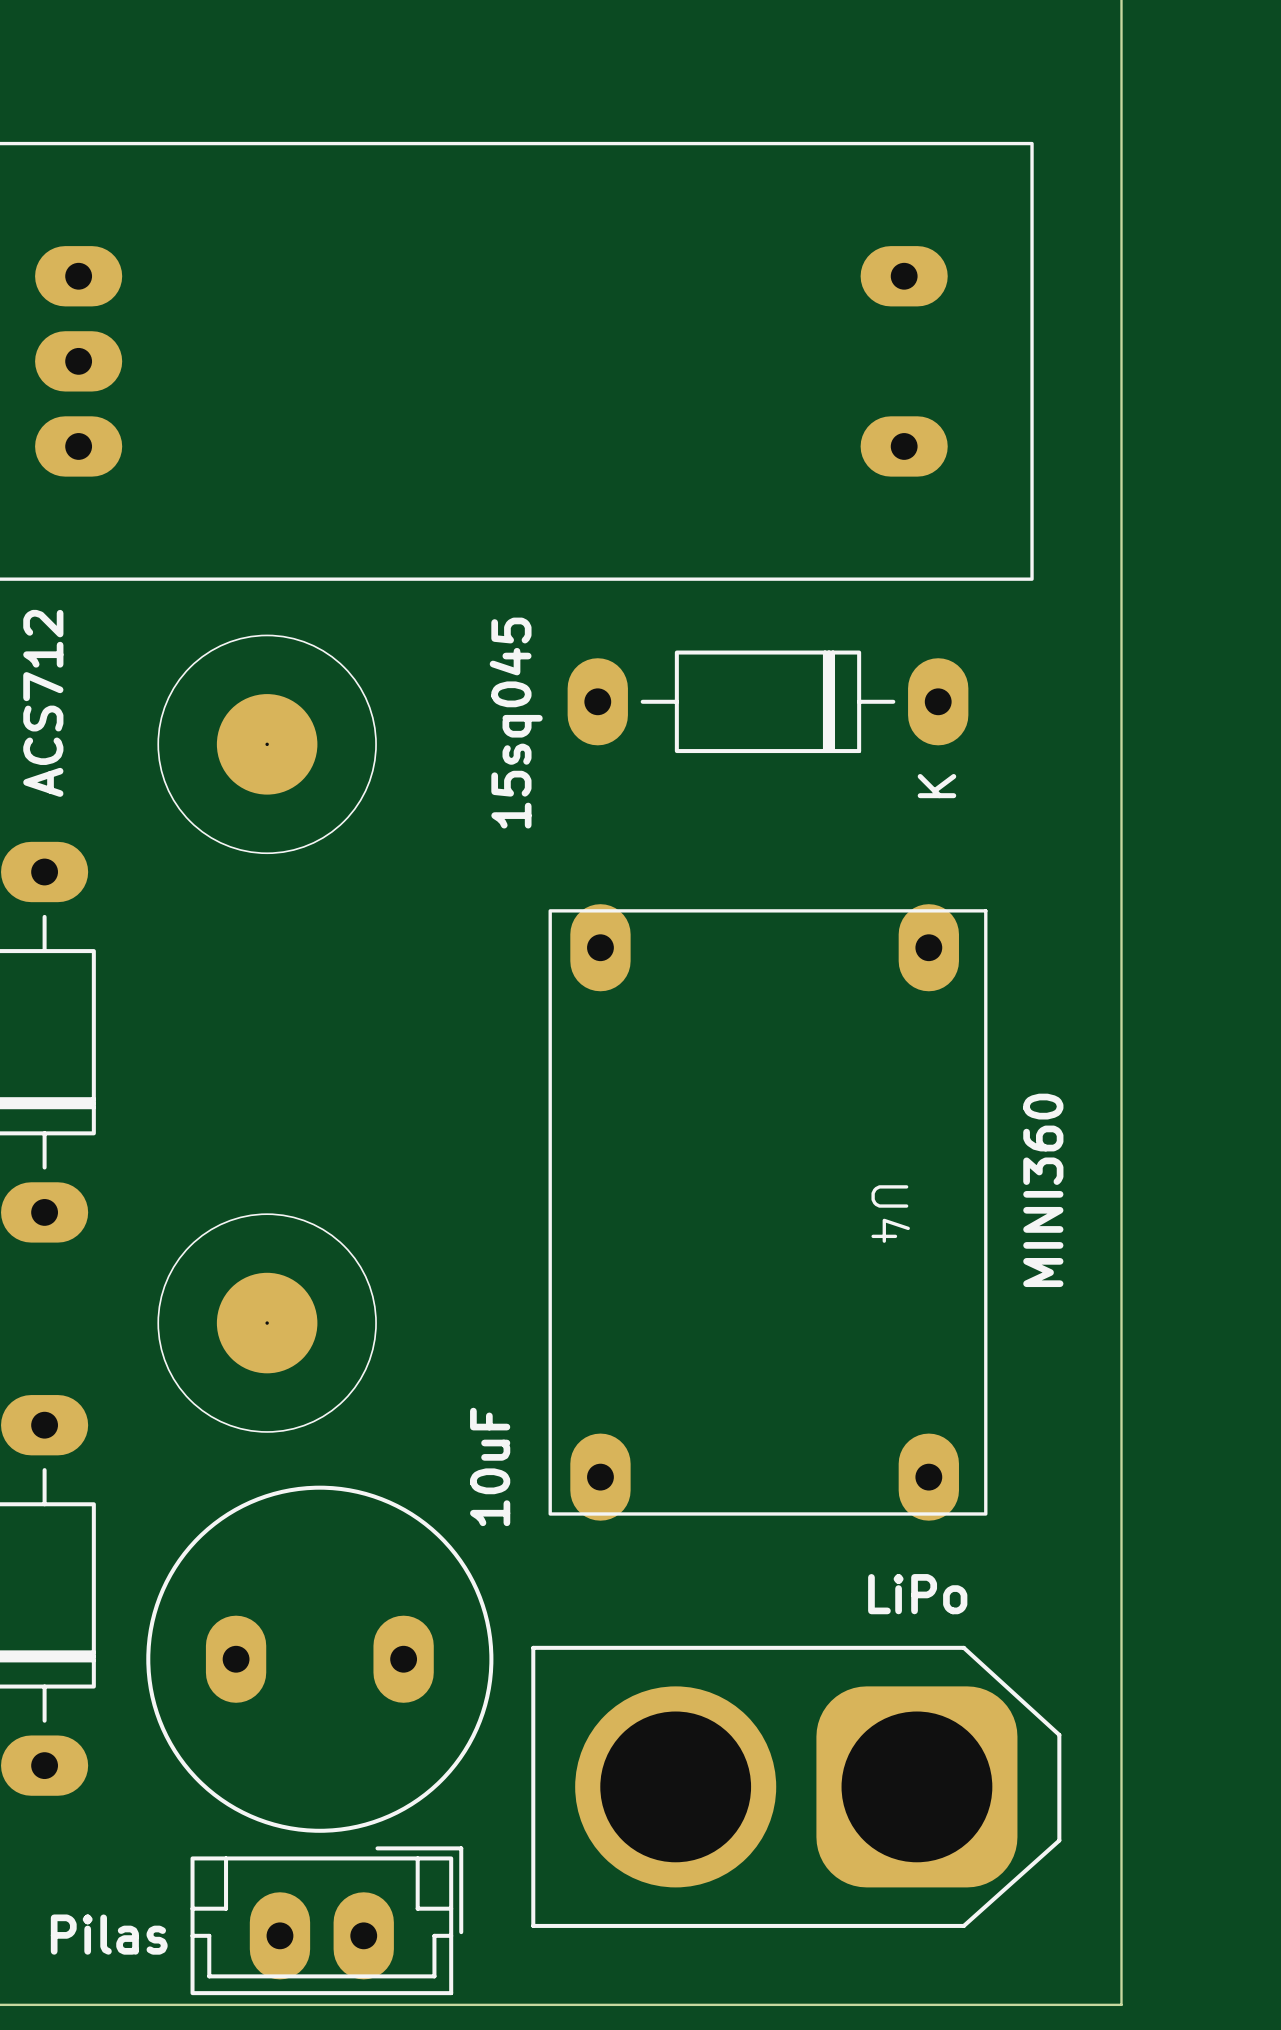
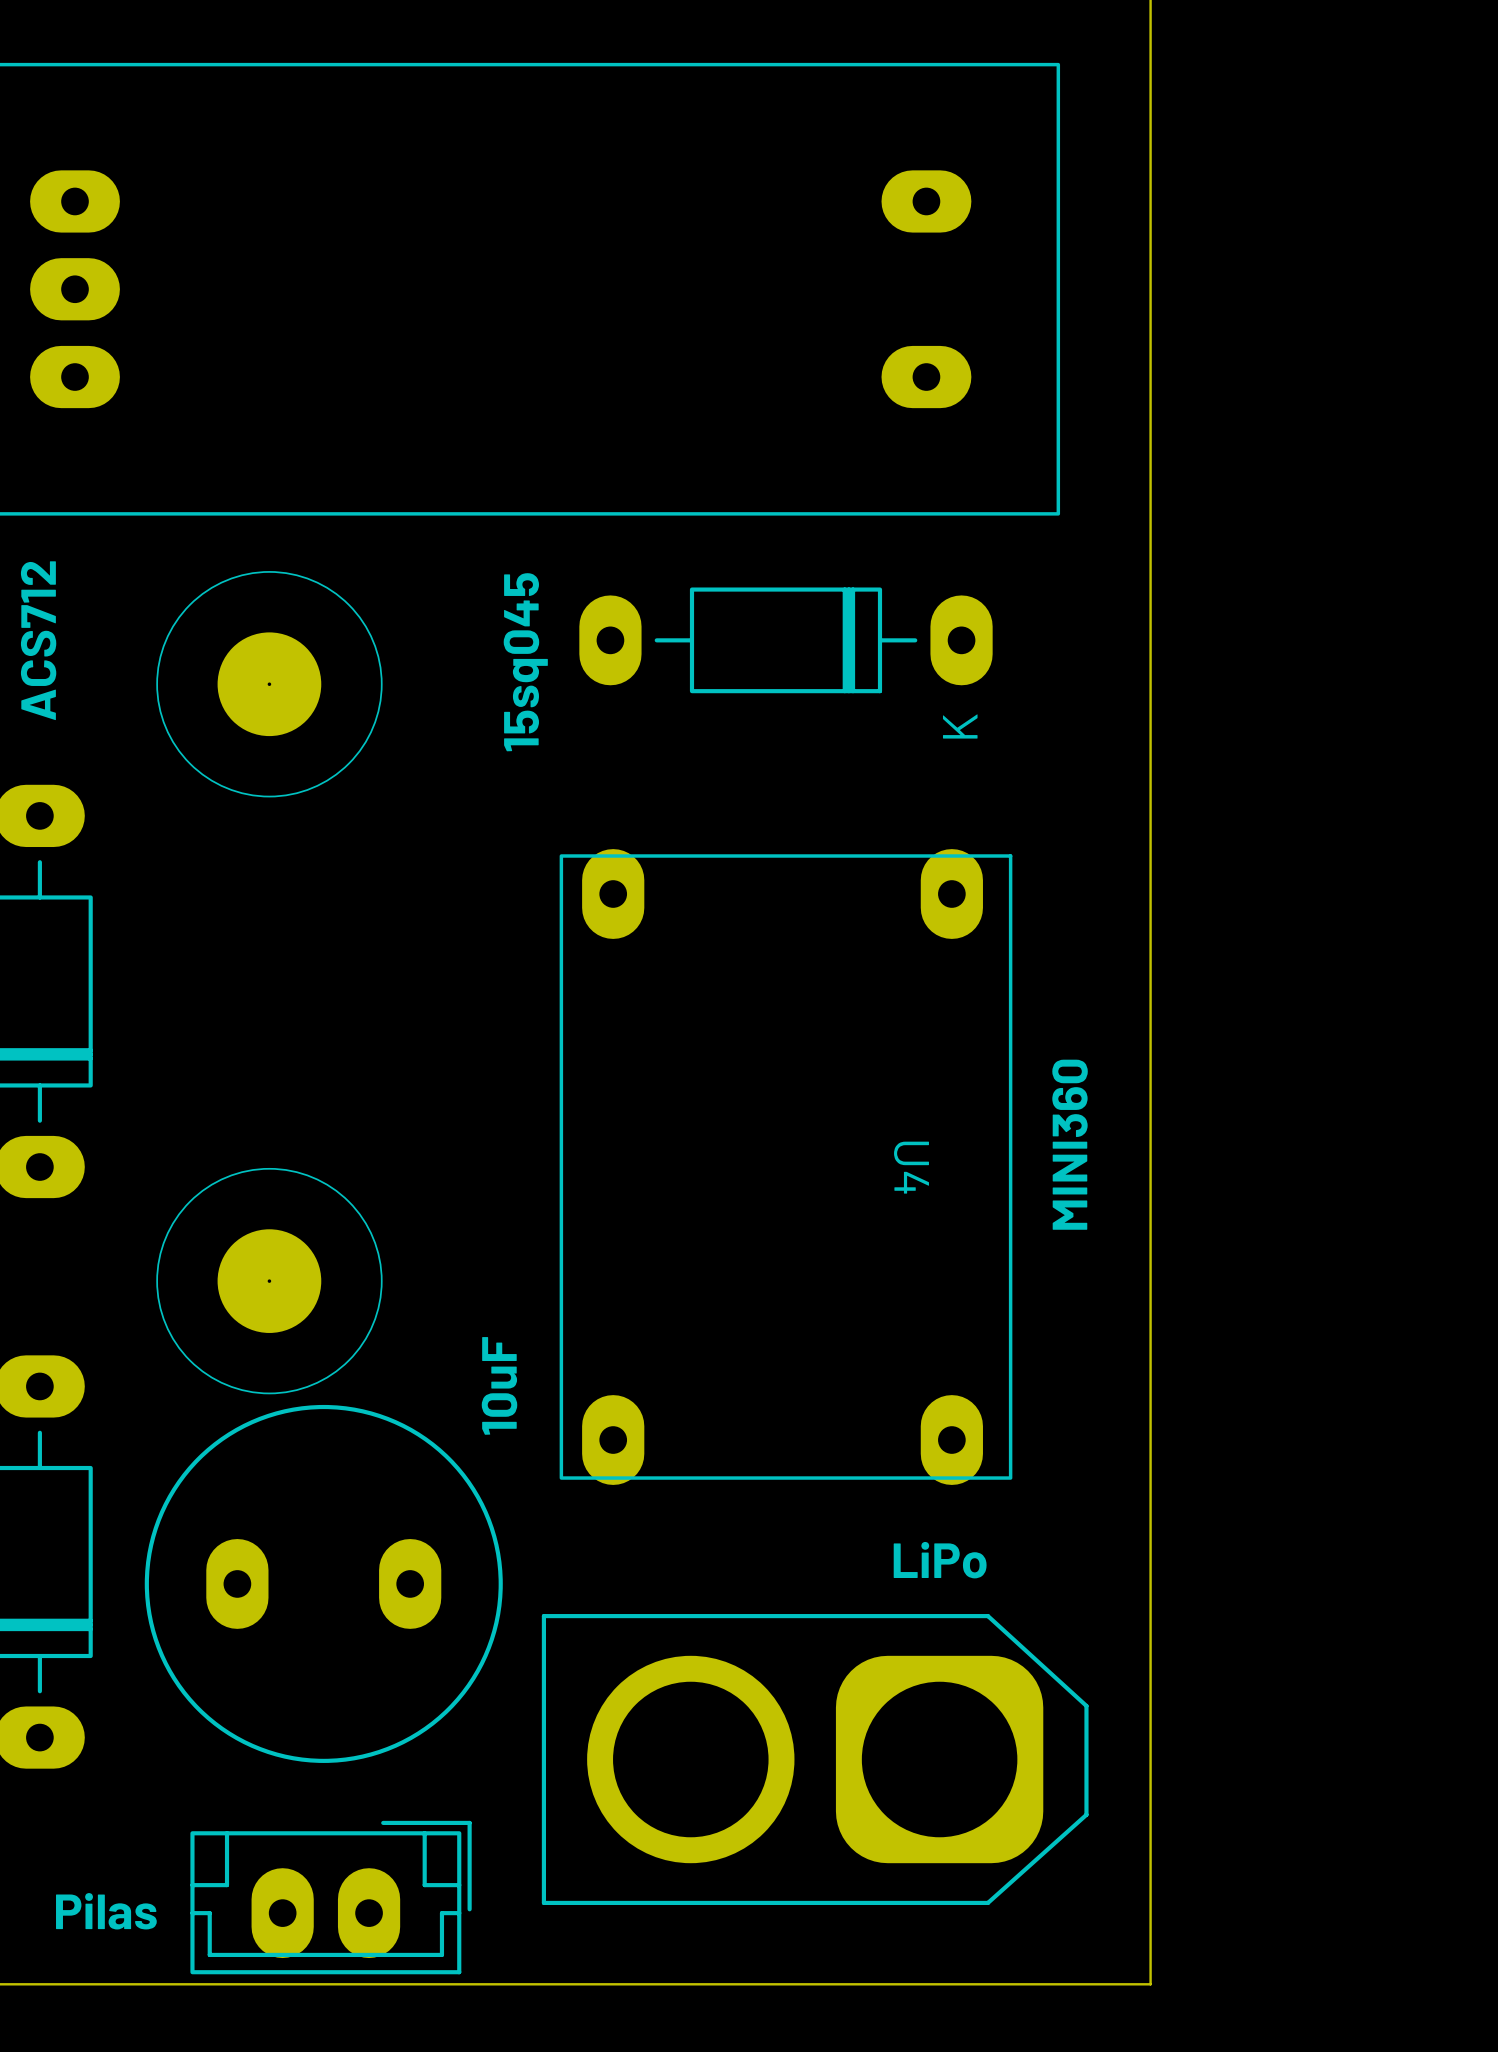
part position: (319, 1659) -> (323, 1583)

